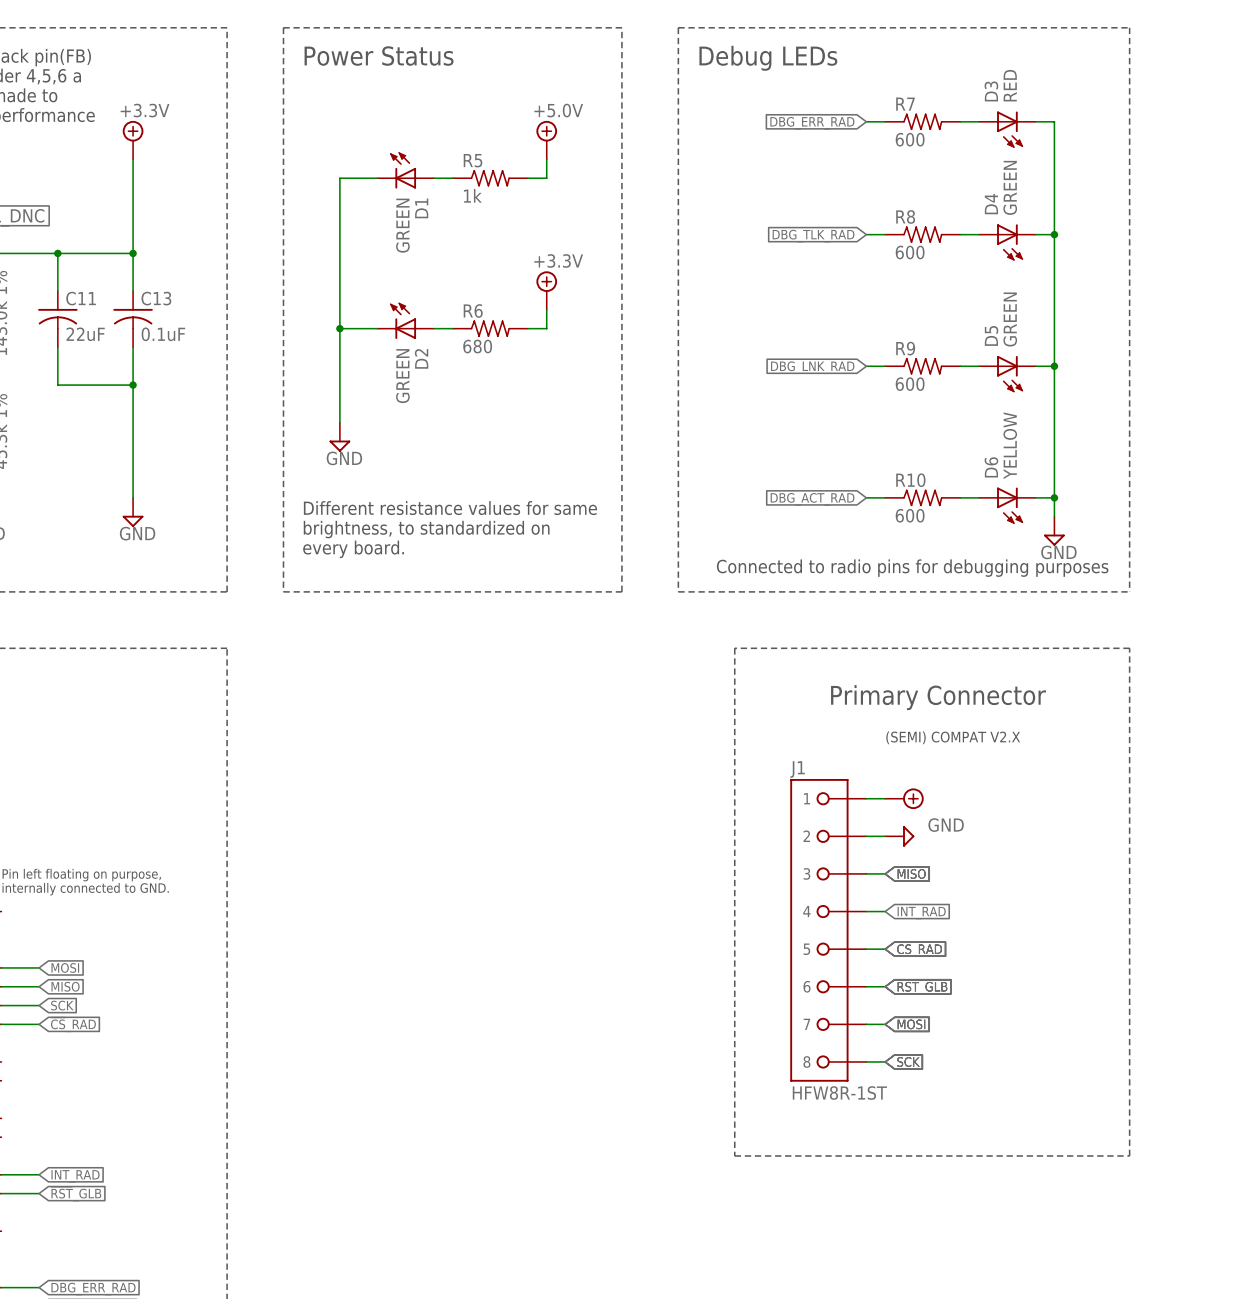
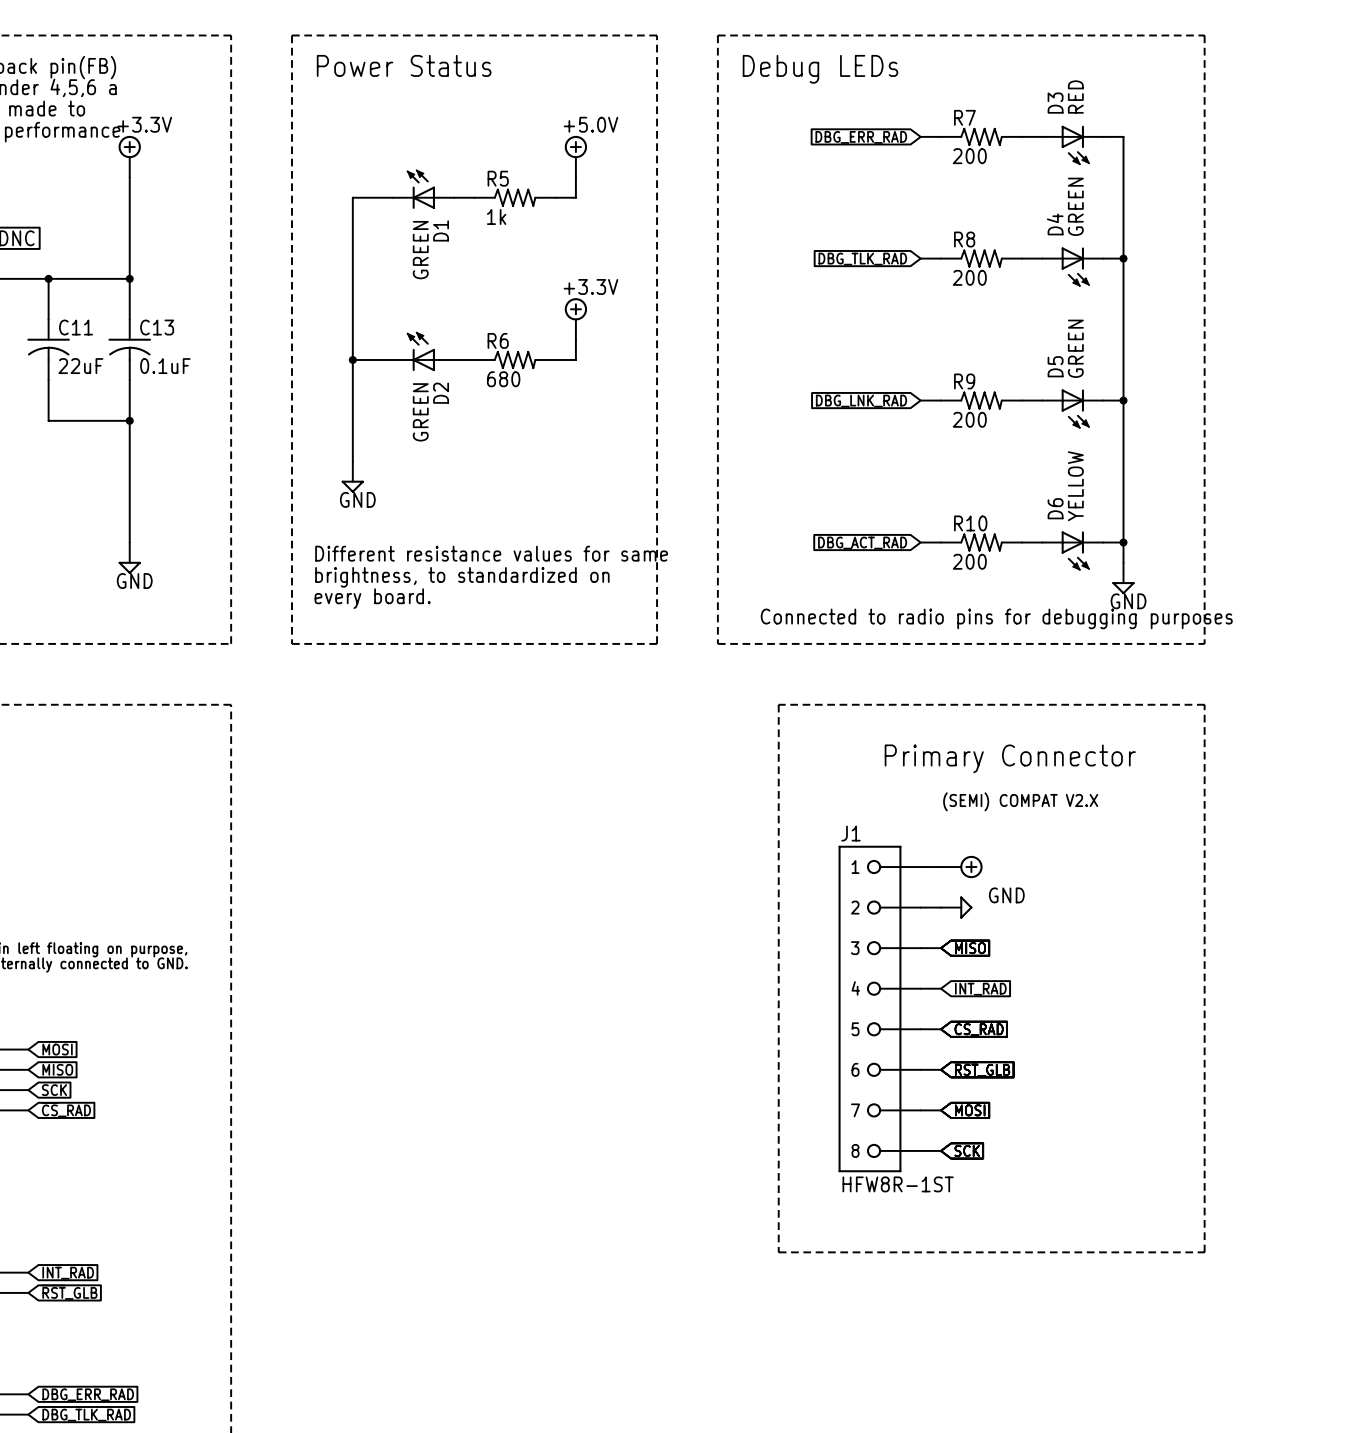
R7 value: 600 (910, 139) -> 200 (969, 156)
R8 value: 600 (910, 252) -> 200 (969, 277)
R9 value: 600 (910, 384) -> 200 (969, 419)
R10 value: 600 (910, 515) -> 200 (969, 561)

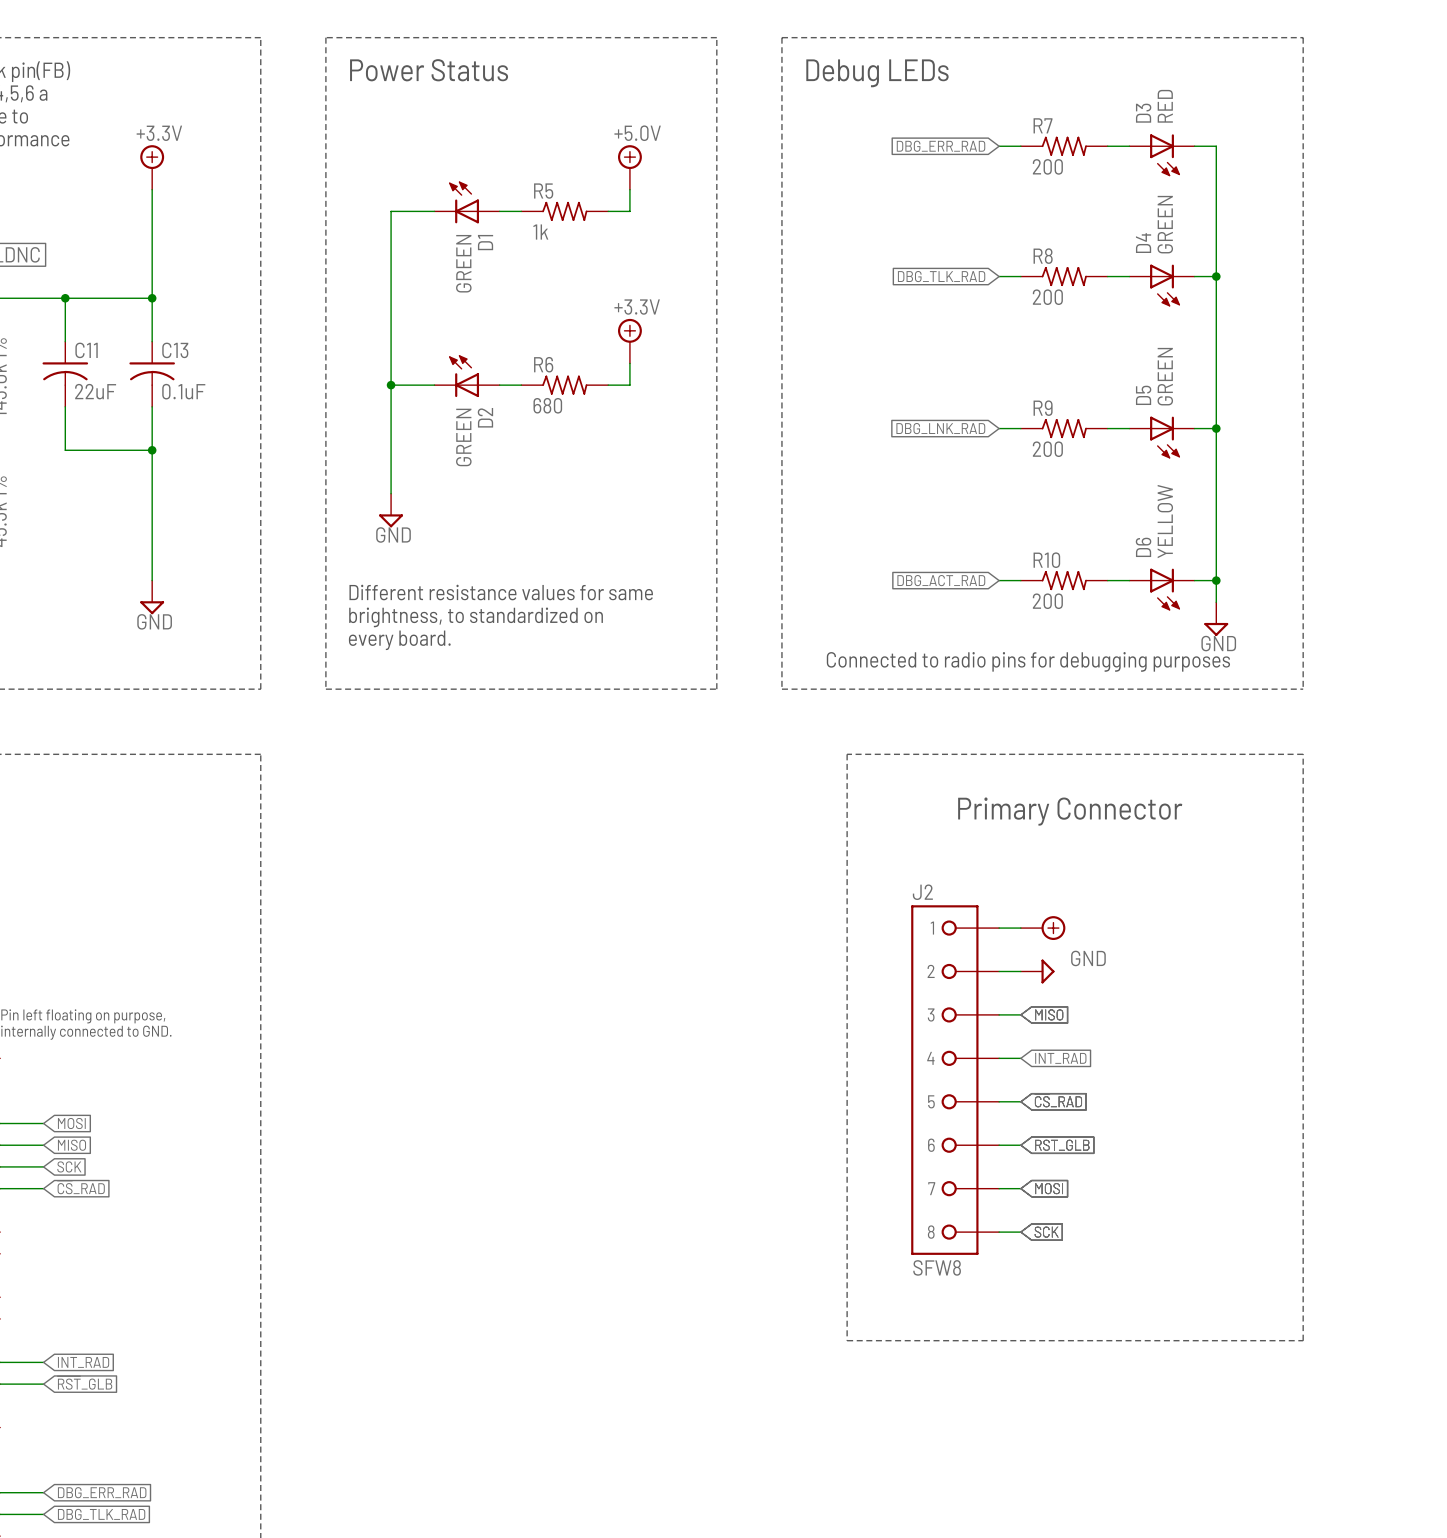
text: (SEMI) COMPAT V2.X (1020, 801) -> none
J1 name: J1 (850, 833) -> J2 (922, 892)
J1 value: HFW8R-1ST (898, 1184) -> SFW8 (937, 1267)

